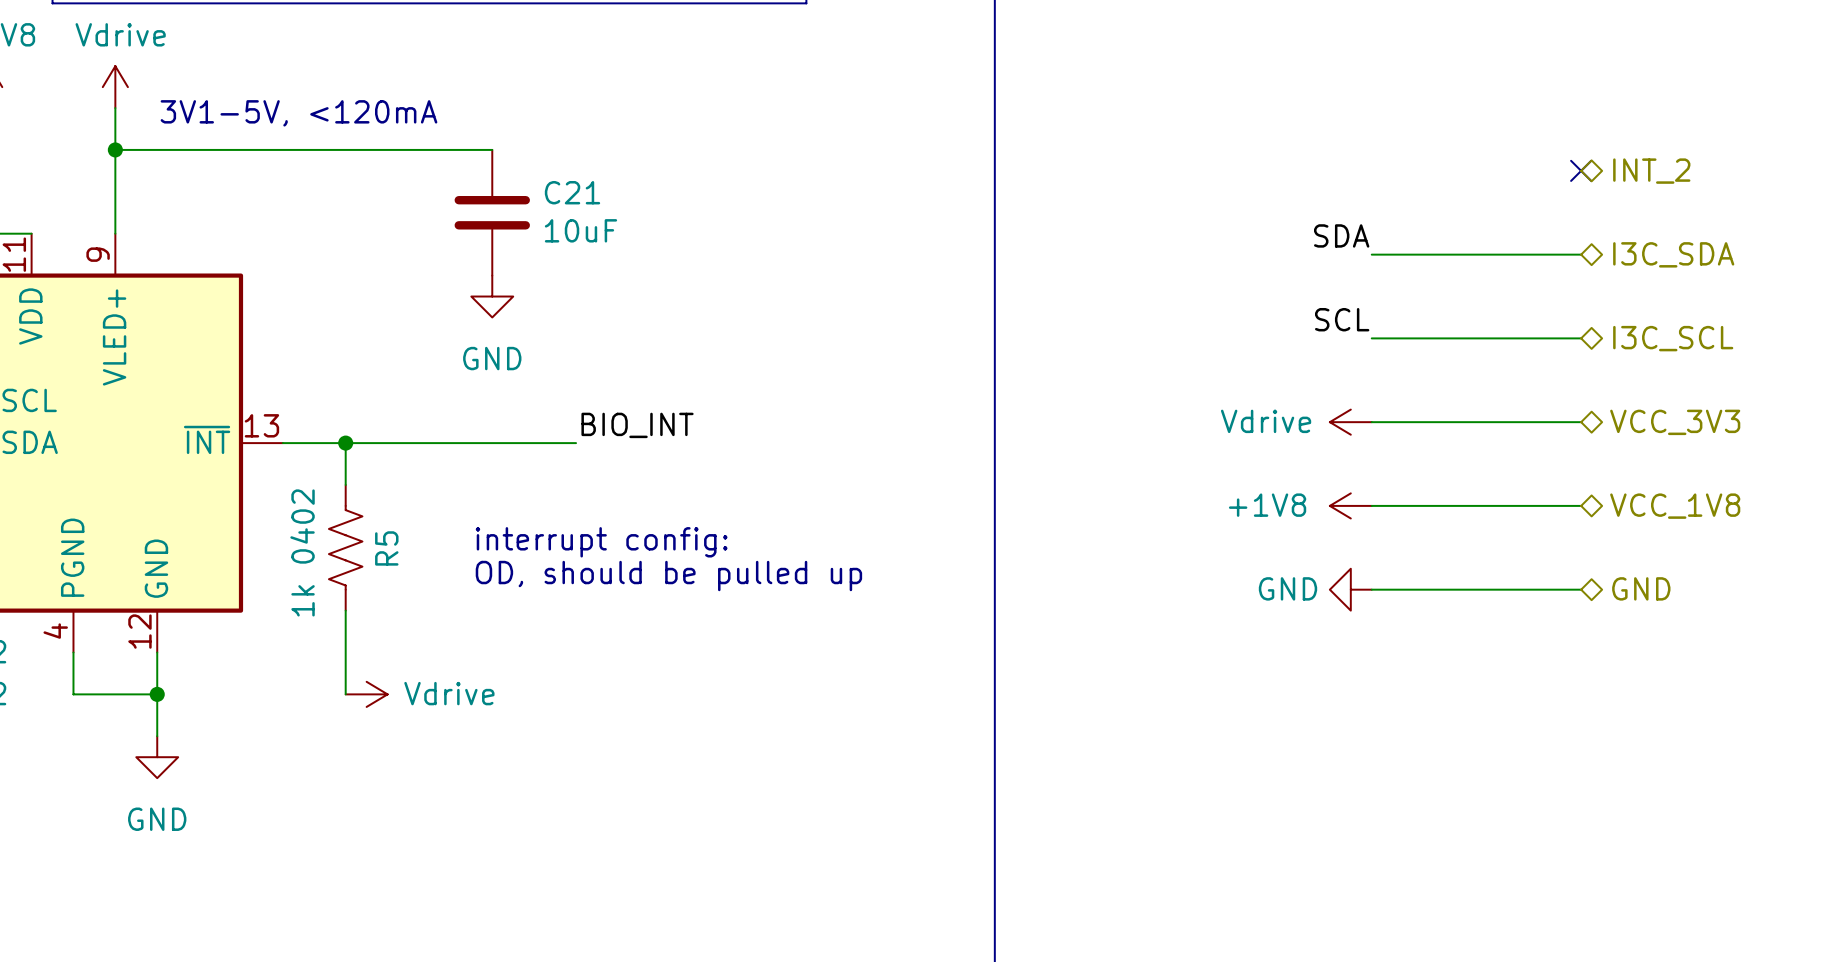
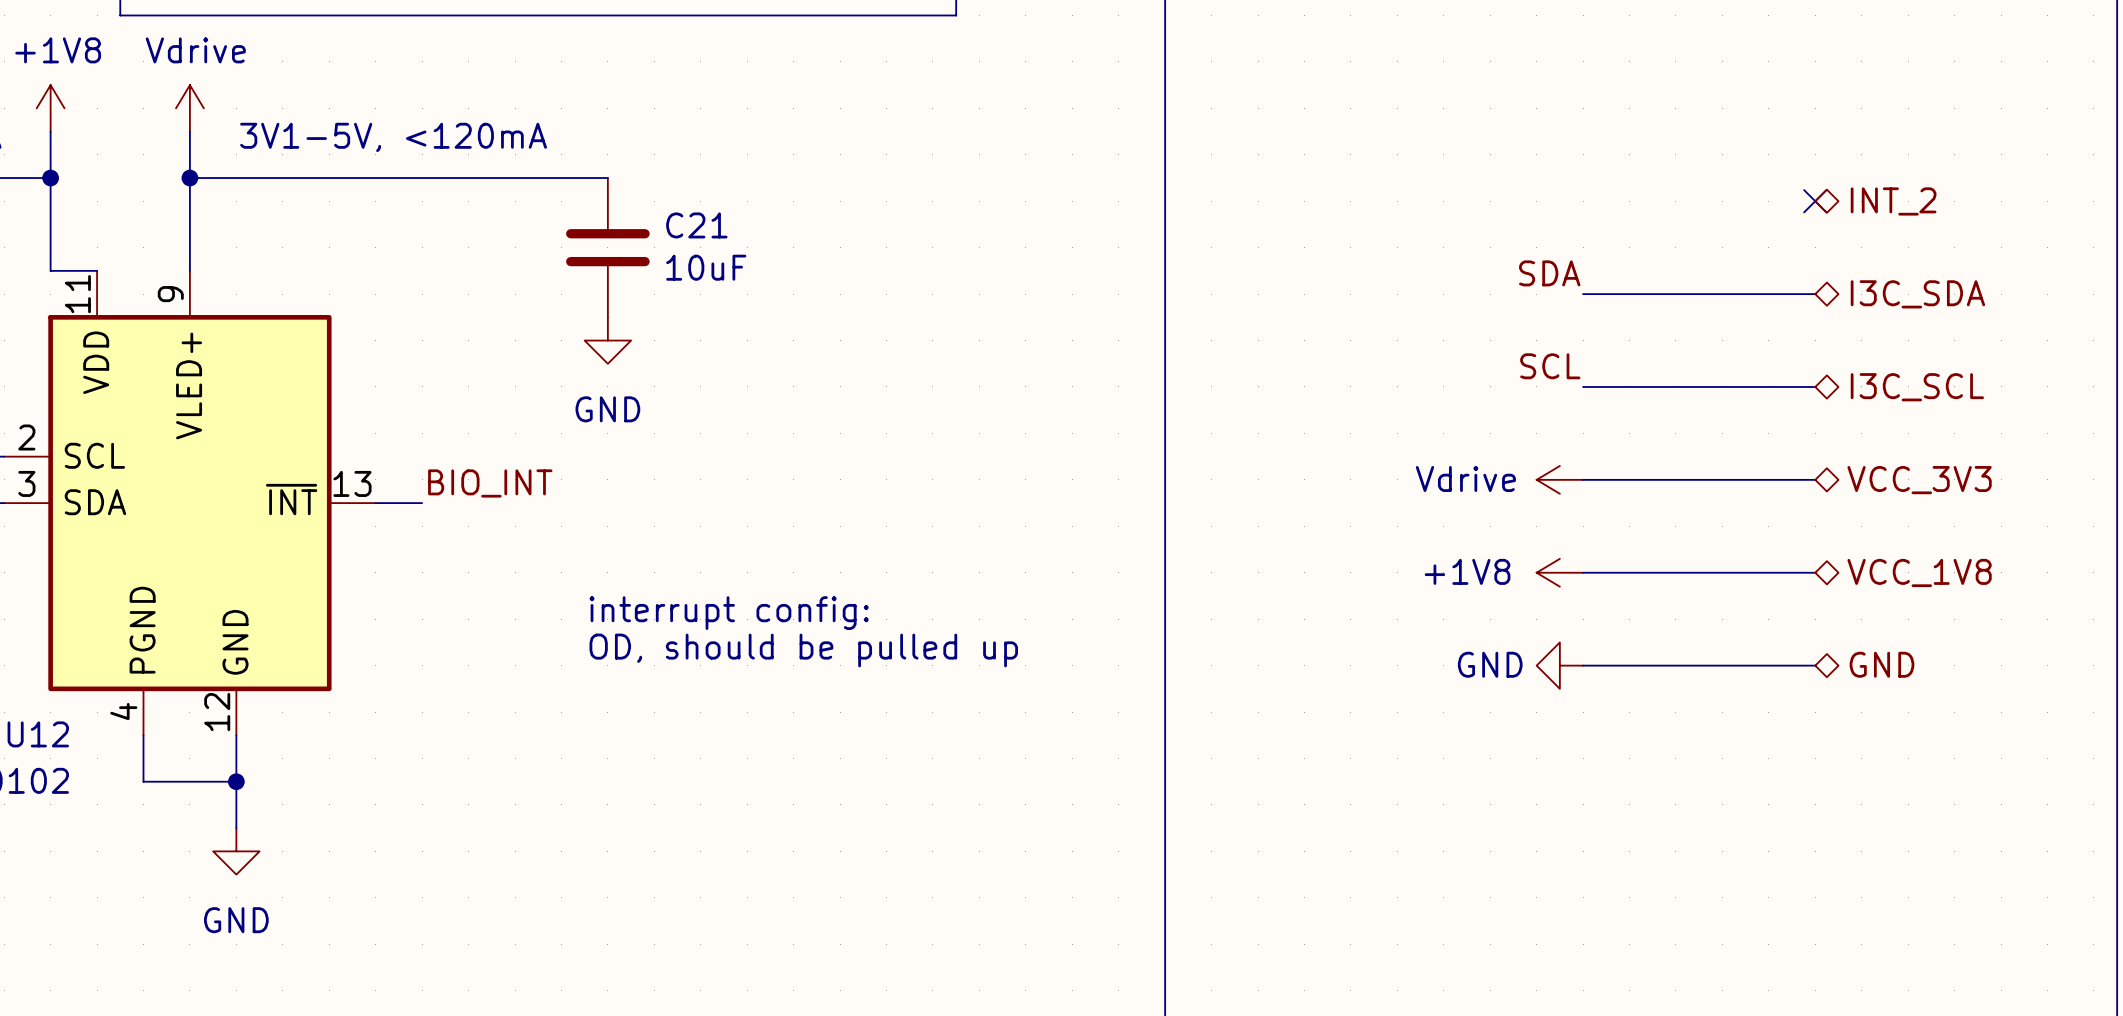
label position: BIO_INT (637, 425) -> BIO_INT (490, 483)
wire: (324, 443) (576, 443) -> none
wire: (345, 443) (345, 484) -> none
junction: (345, 443) -> none
R5: 1k 0402 (345, 547) -> none
wire: (345, 610) (345, 694) -> none
power symbol: Vdrive (366, 694) -> none

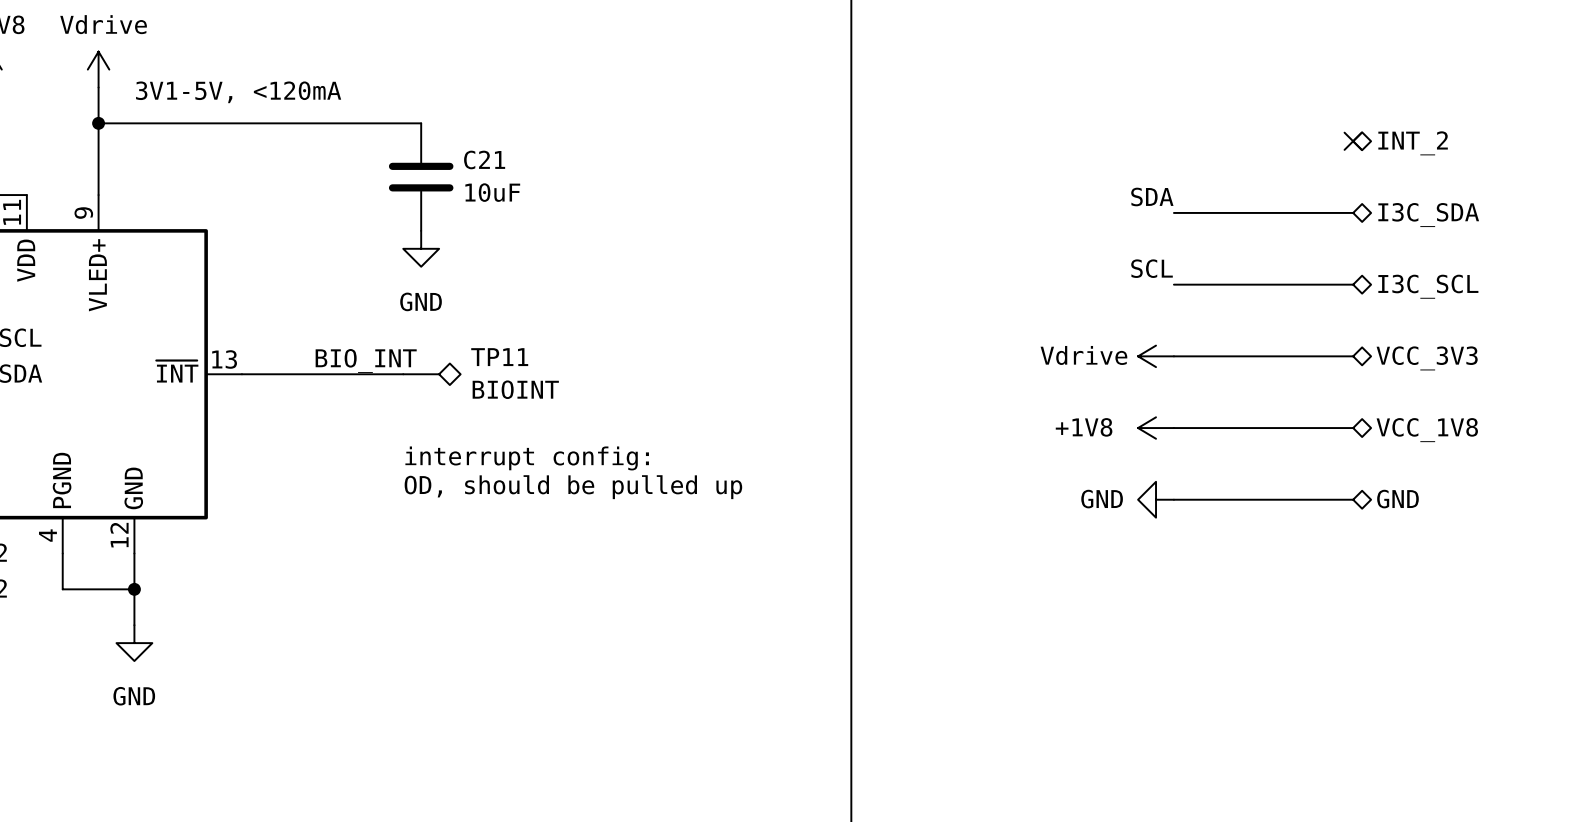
label position: BIO_INT (490, 483) -> BIO_INT (366, 361)
wire: none -> (277, 374) (403, 374)
TP11: none -> BIOINT (431, 374)

